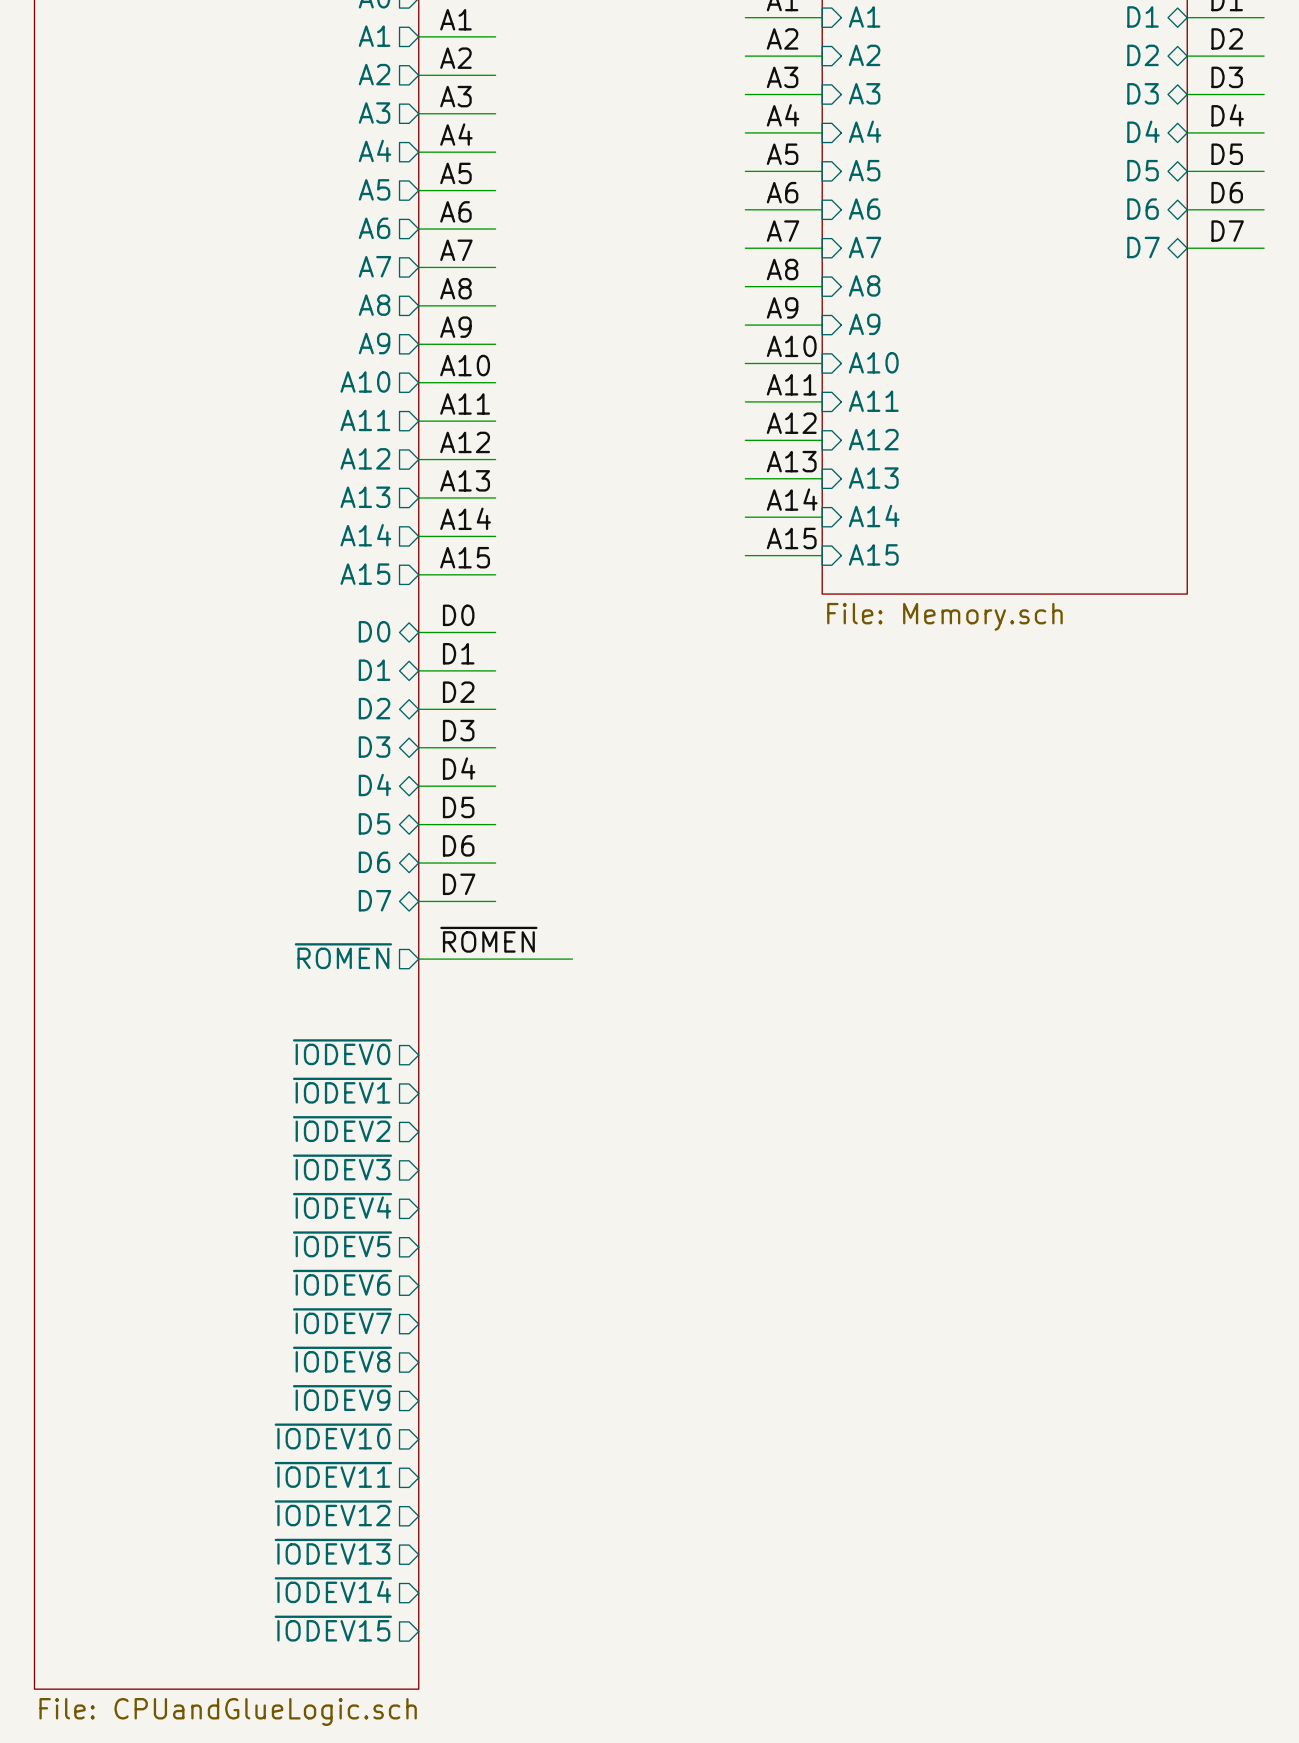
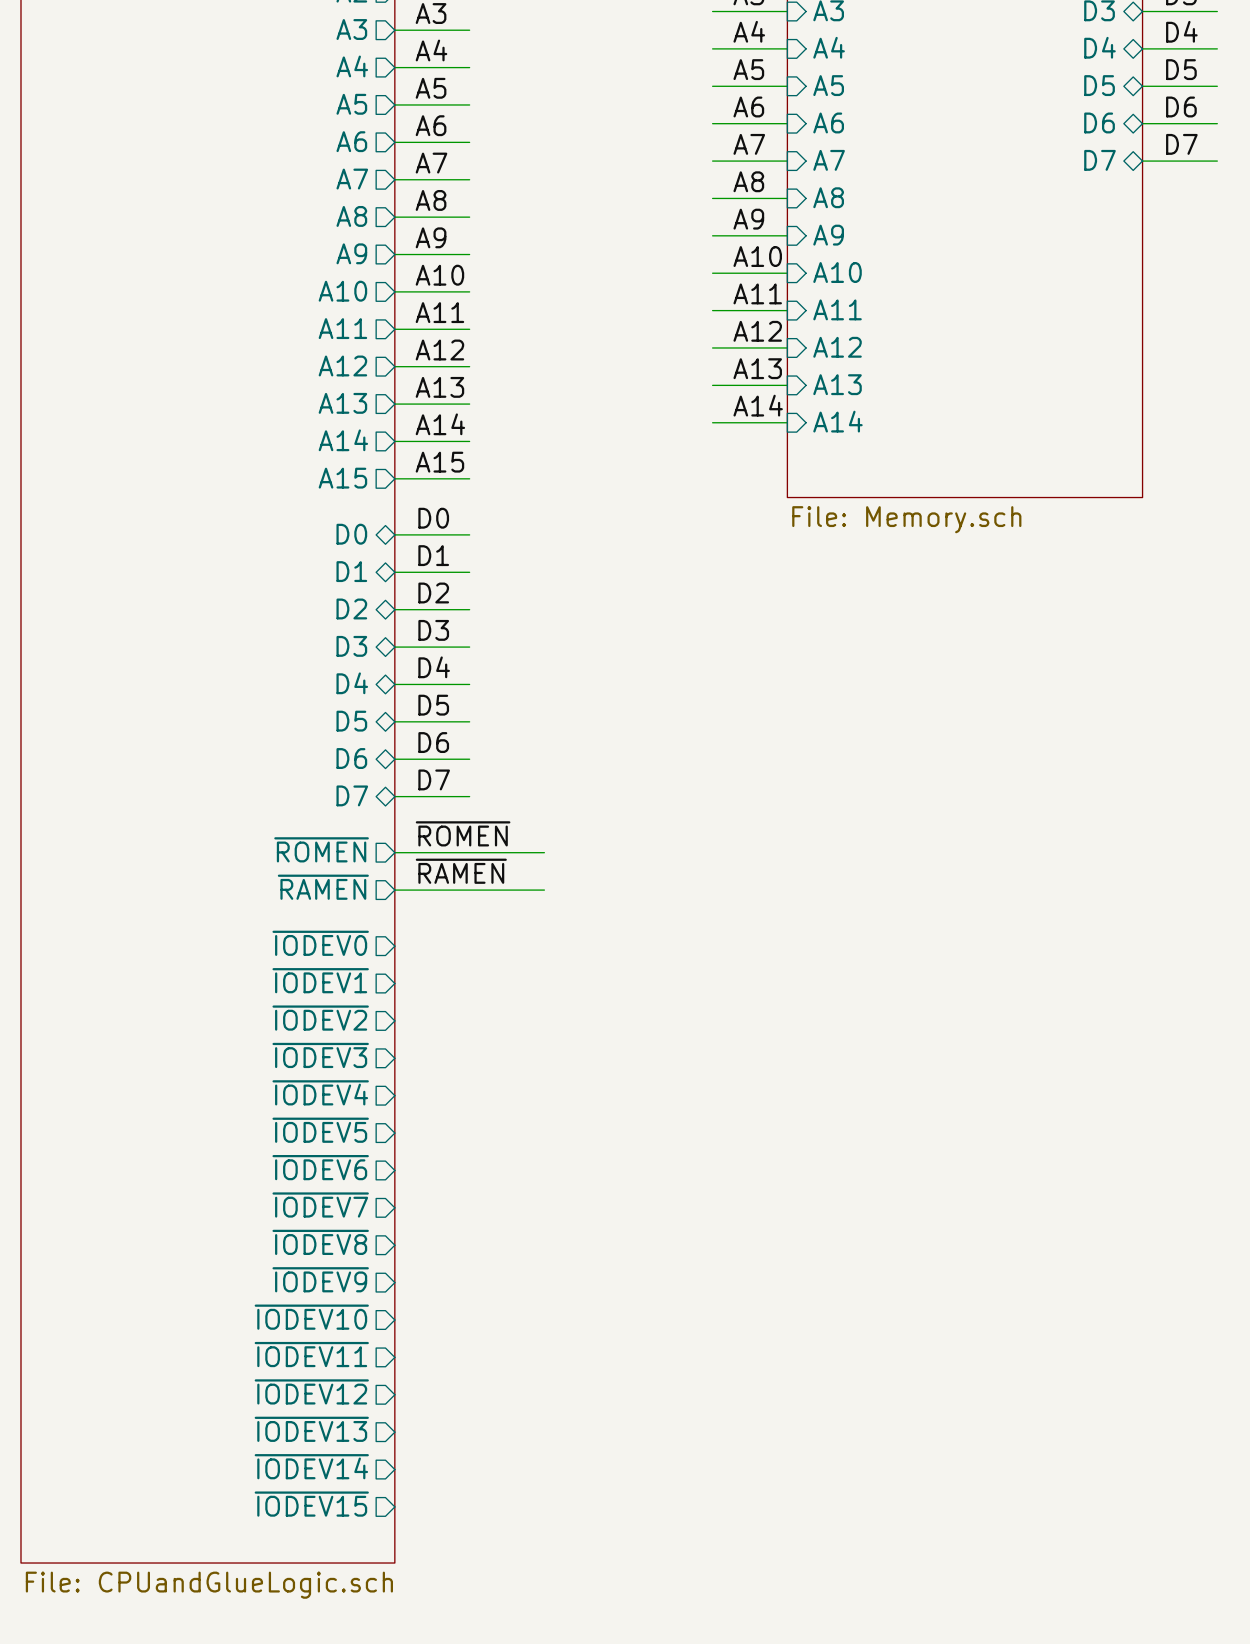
label: A15 (791, 538) -> none
sheet pin: A15 (873, 554) -> none
wire: (745, 555) (822, 555) -> none
label: none -> ~{RAMEN} (461, 871)
sheet pin: none -> ~{RAMEN} (323, 887)
wire: none -> (394, 890) (544, 890)

